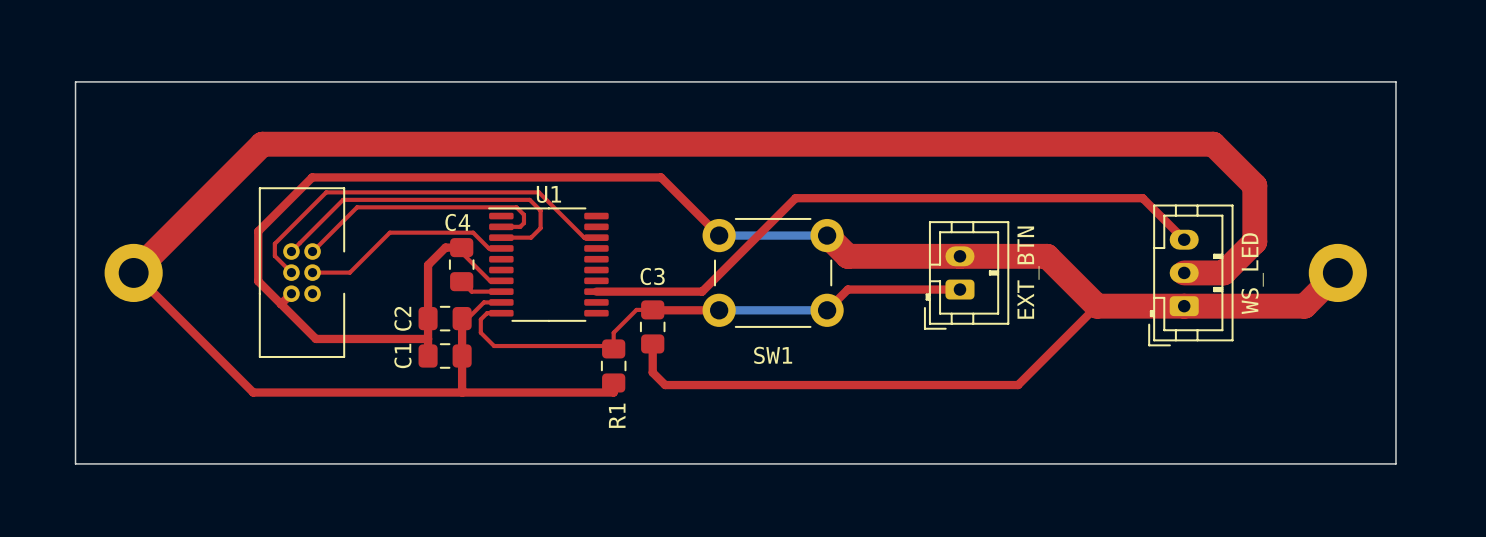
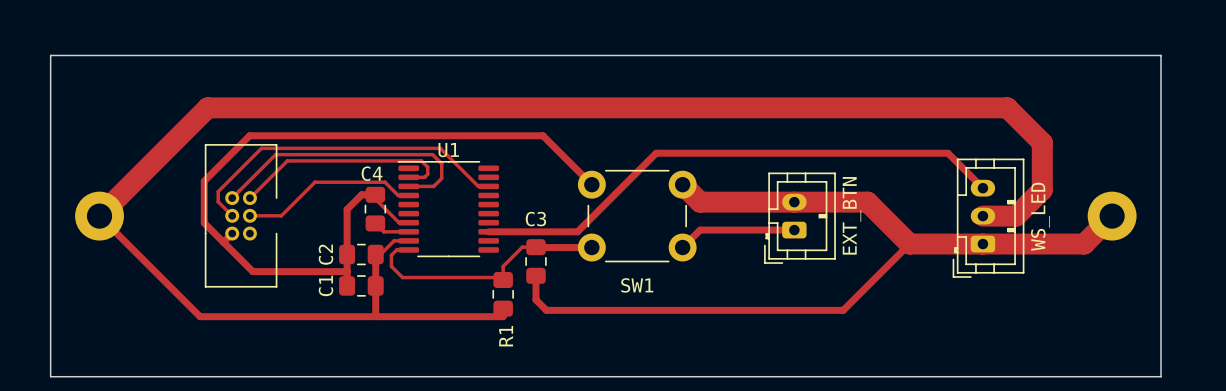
bottom track: (719, 235) (827, 235) -> none
bottom track: (719, 310) (827, 310) -> none

